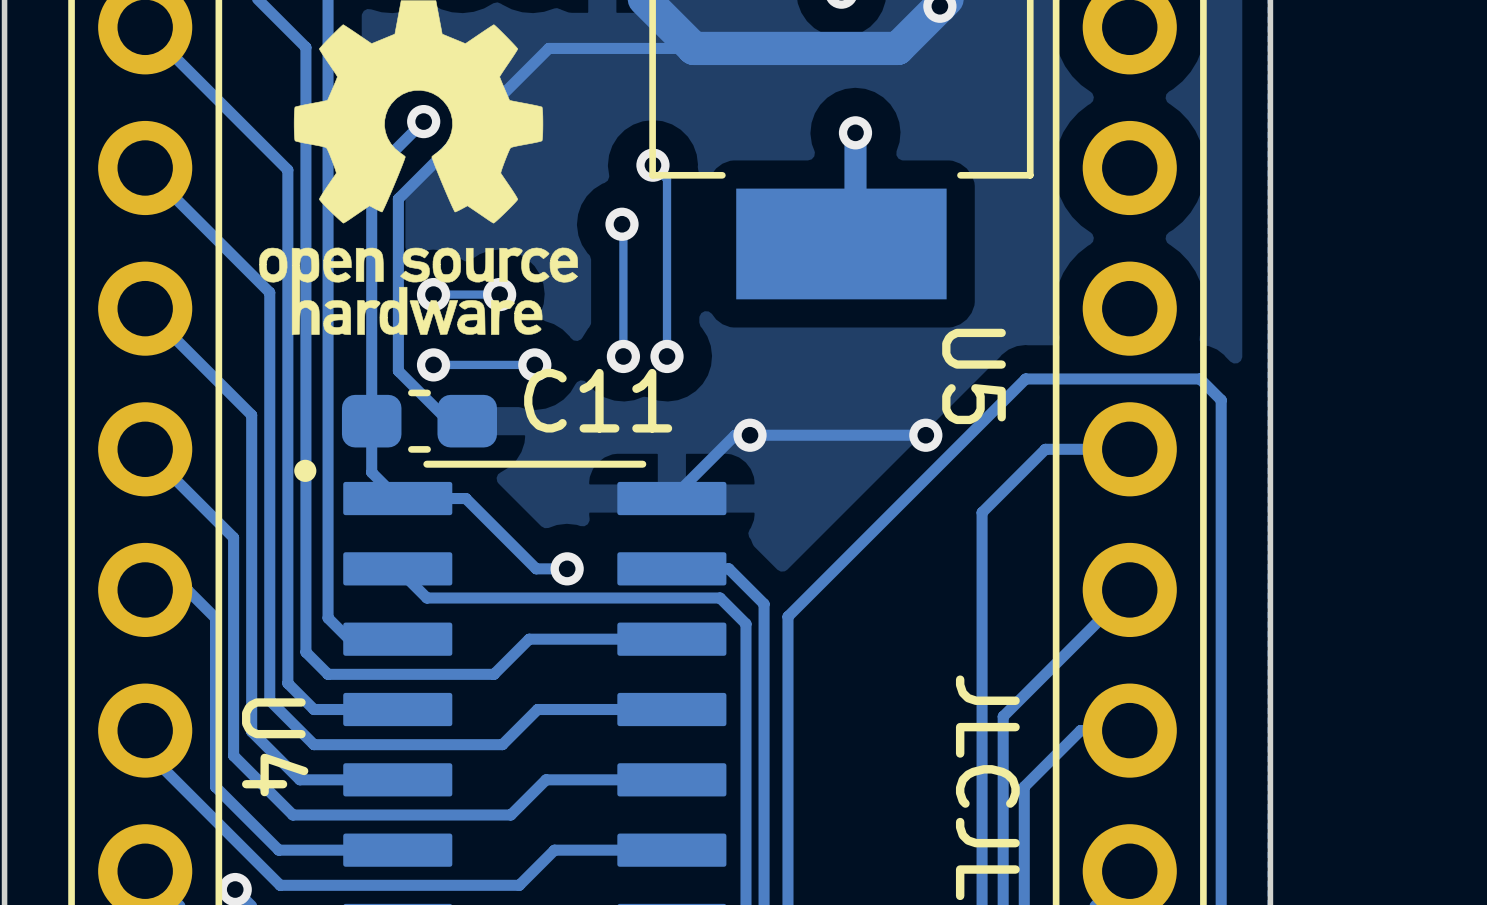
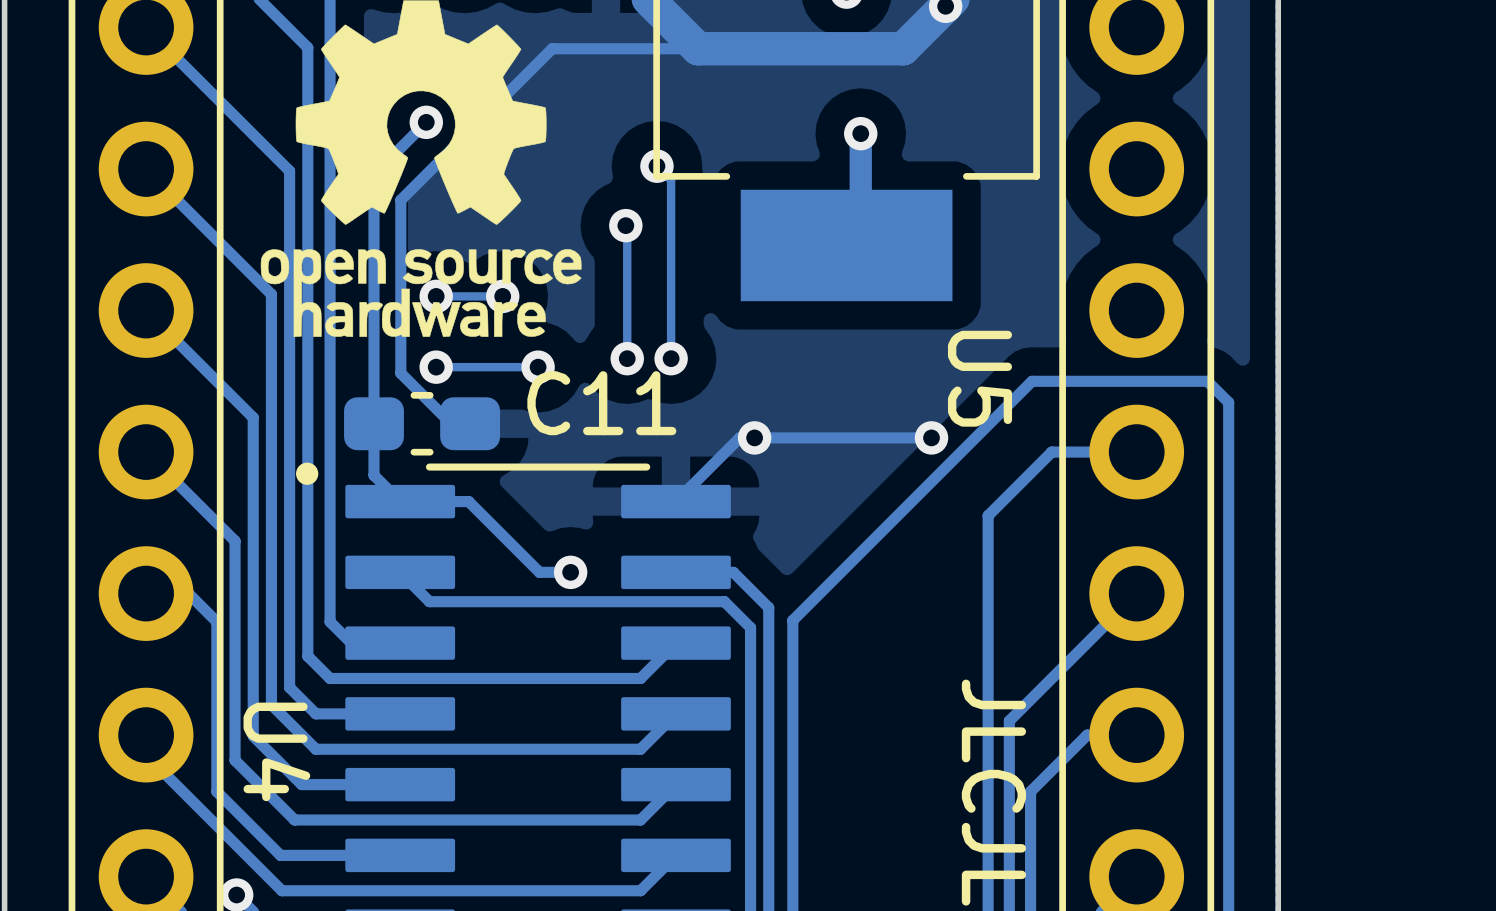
track: (671, 639) (529, 639) (494, 674) -> (676, 643) (640, 678) (497, 678)
track: (671, 709) (537, 709) (502, 744) -> (676, 713) (640, 749) (505, 749)
track: (671, 779) (546, 779) (510, 814) -> (676, 784) (640, 820) (514, 820)
track: (671, 850) (554, 850) (519, 885) -> (676, 855) (640, 890) (522, 890)

